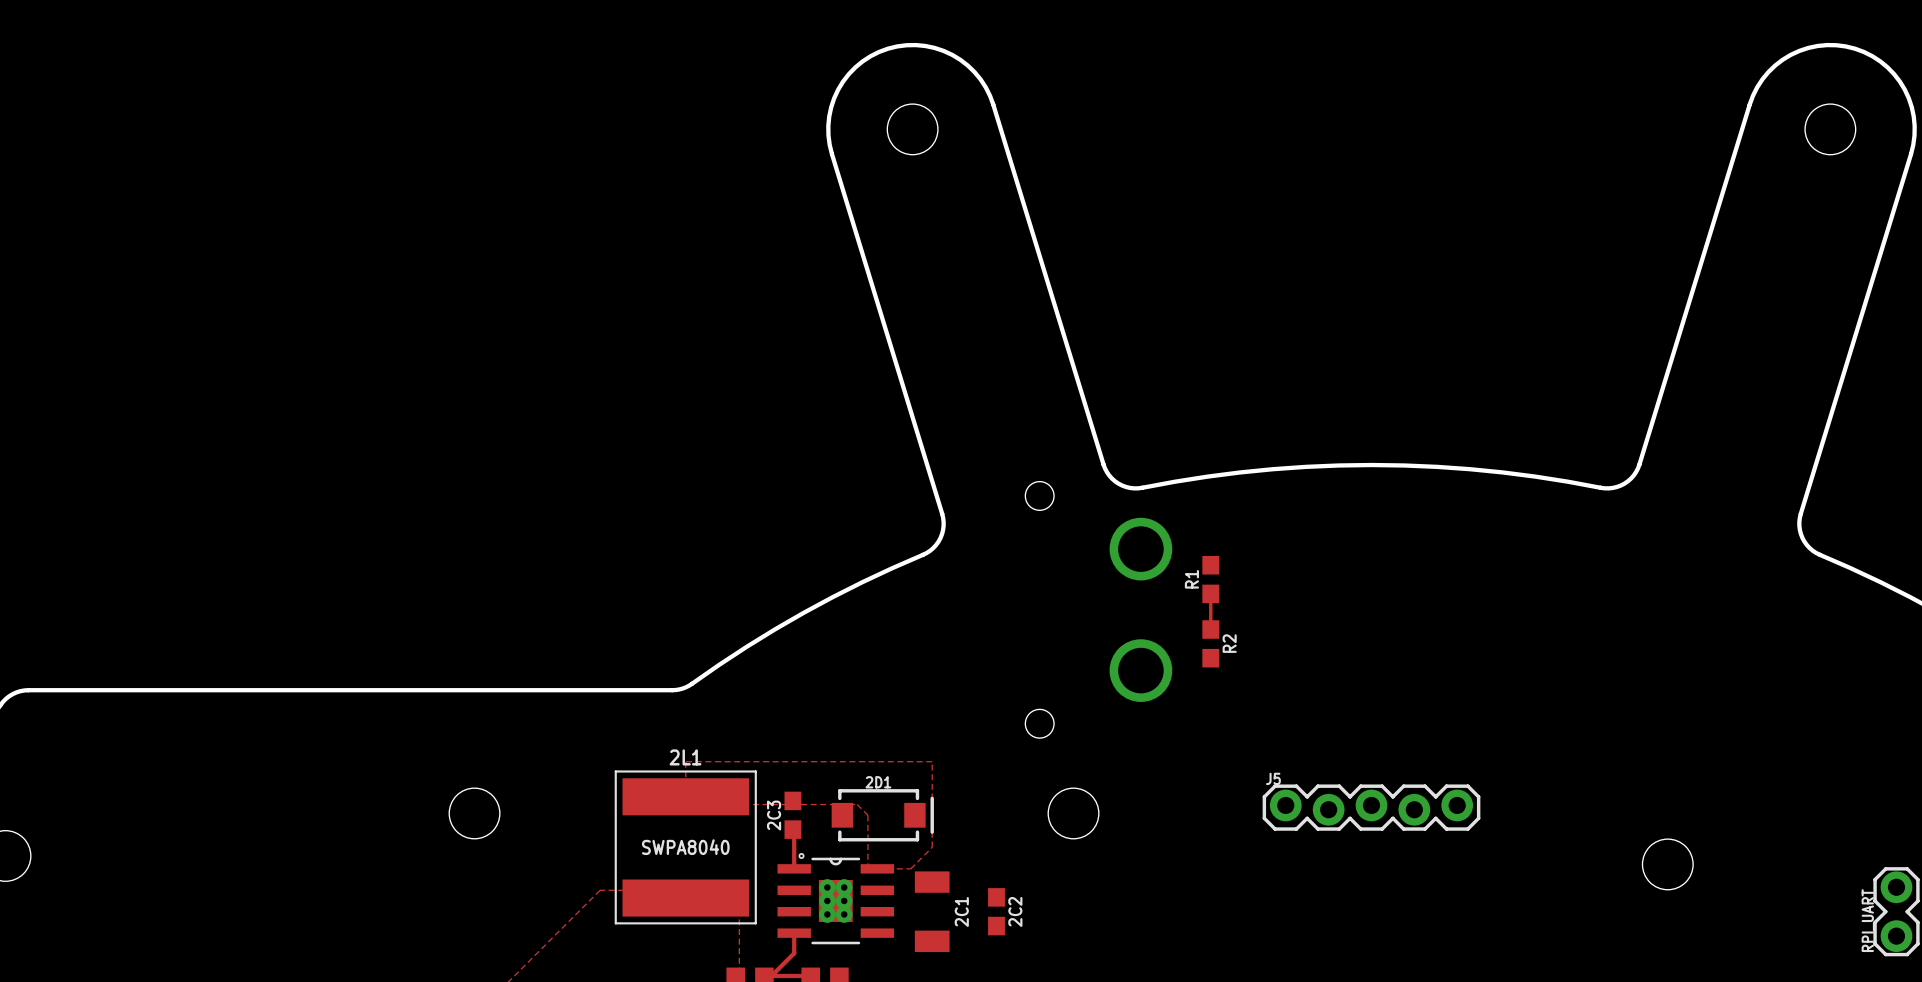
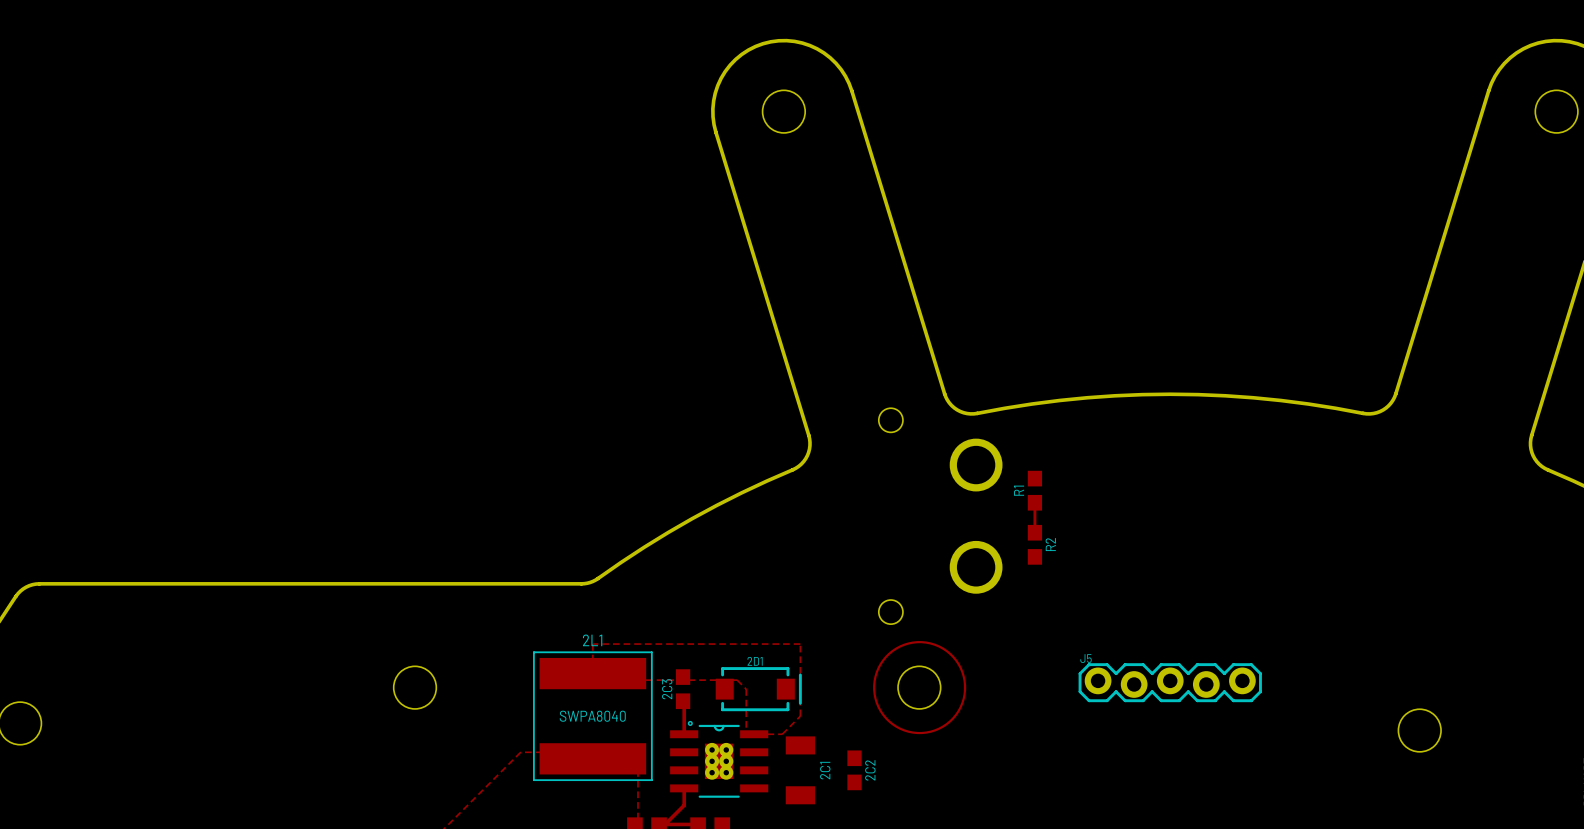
drawing: none -> [873, 641, 967, 735]

